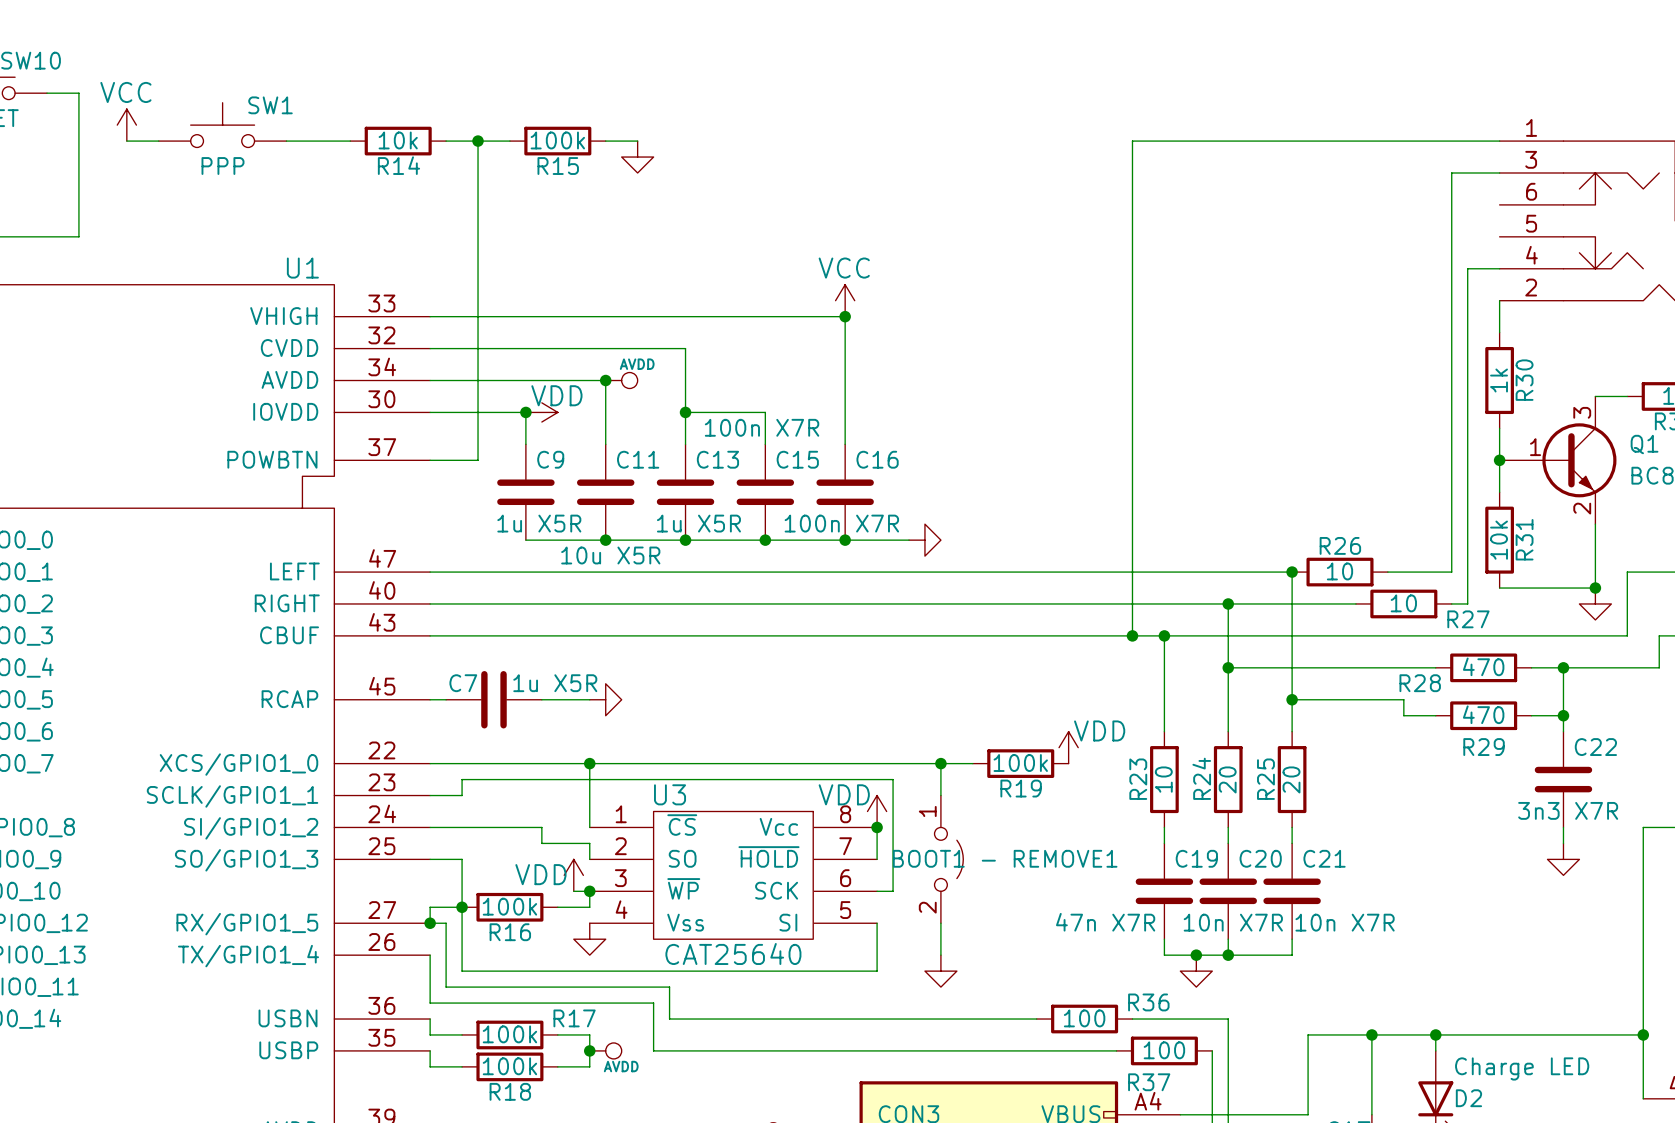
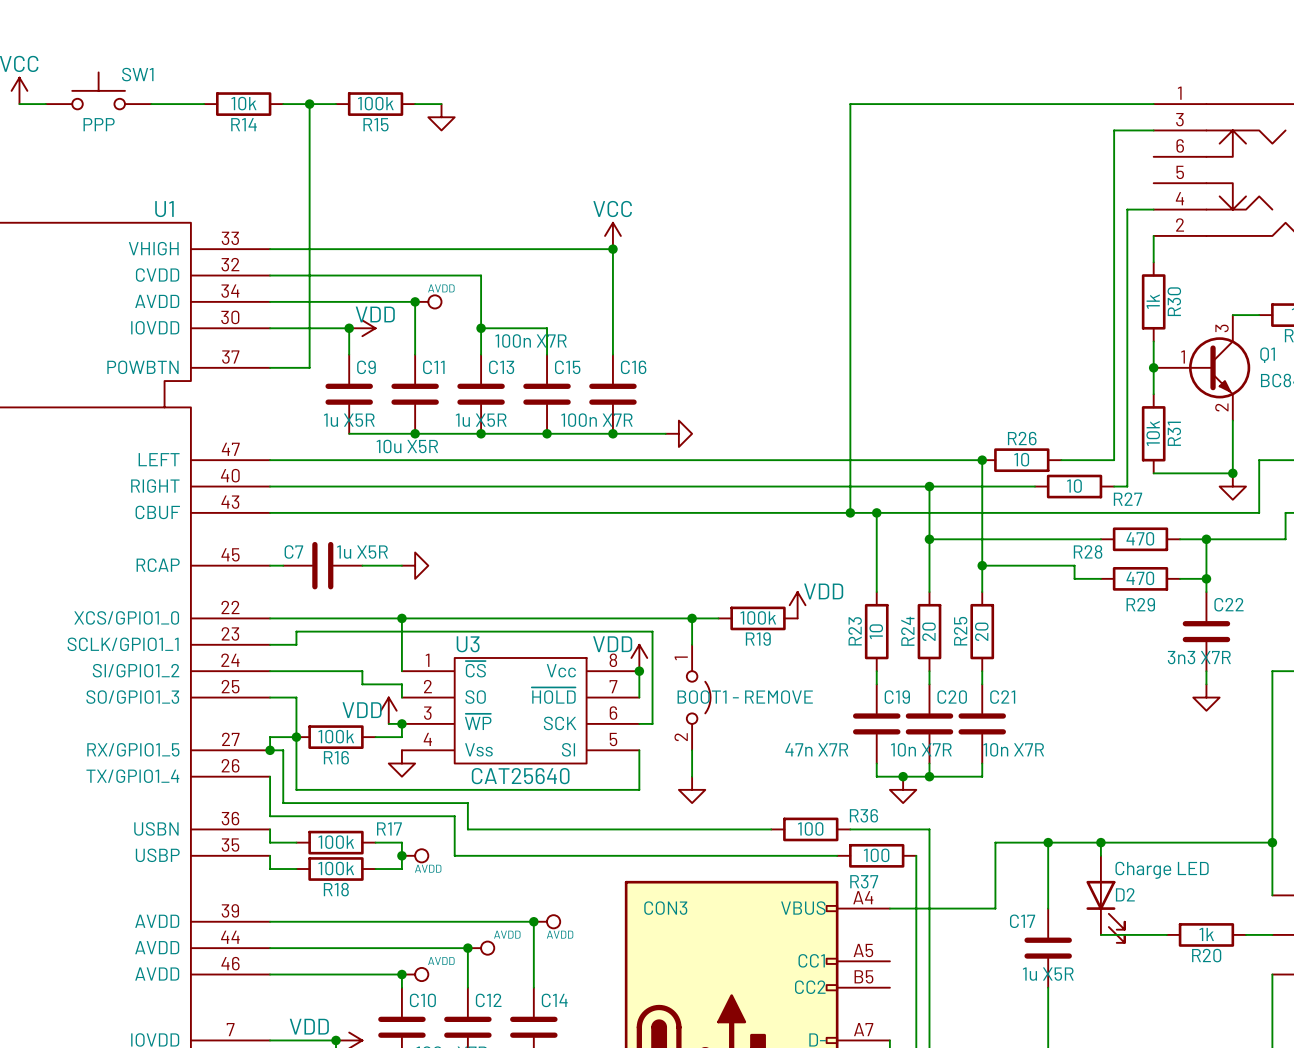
BOOT1 - REMOVE1 name: BOOT1 - REMOVE1 (1005, 858) -> BOOT1 - REMOVE (745, 697)

